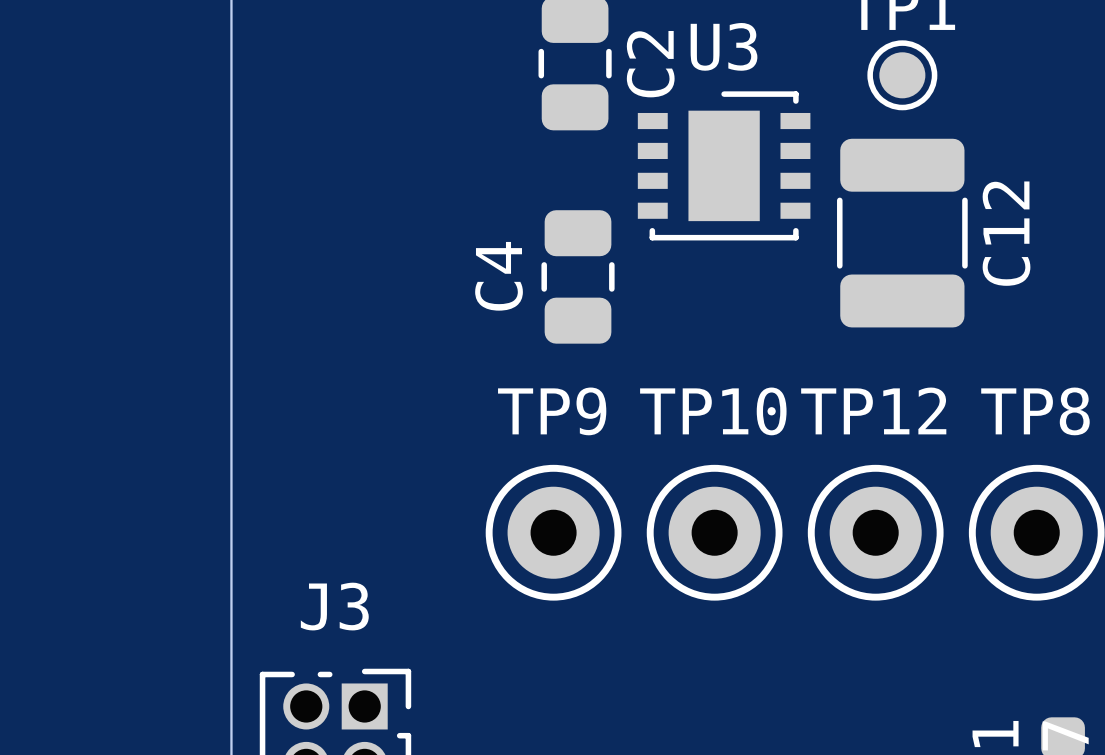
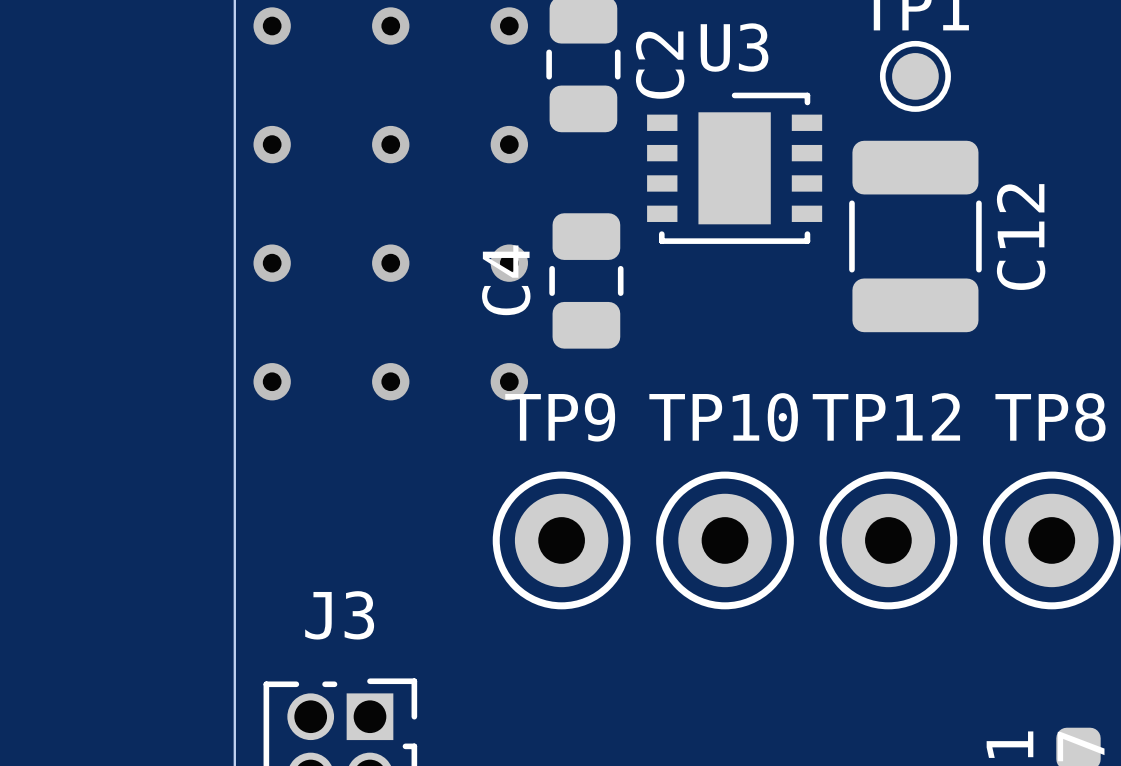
via: none -> (272, 26)
via: none -> (390, 26)
via: none -> (509, 26)
via: none -> (272, 144)
via: none -> (390, 144)
via: none -> (509, 144)
via: none -> (272, 263)
via: none -> (390, 263)
via: none -> (509, 263)
via: none -> (272, 381)
via: none -> (390, 381)
via: none -> (509, 381)

